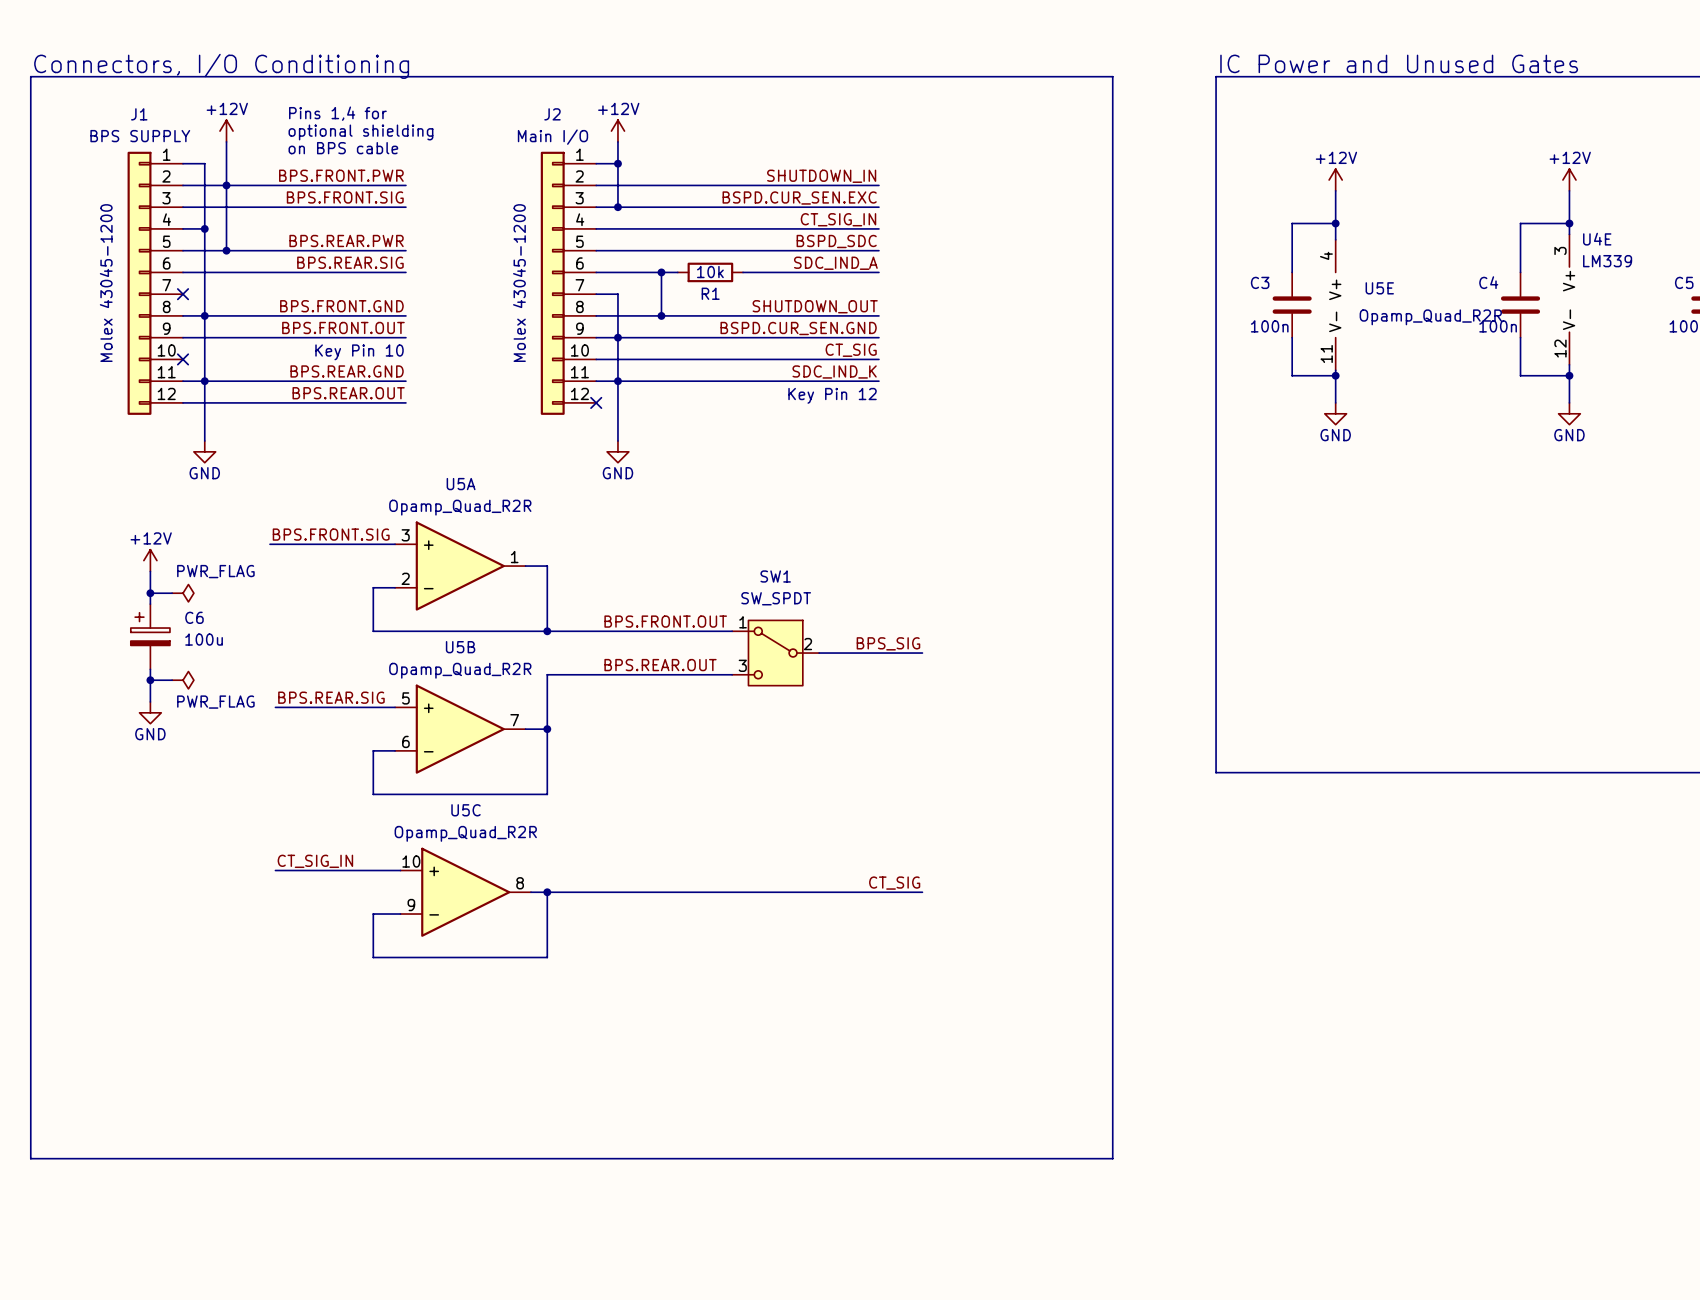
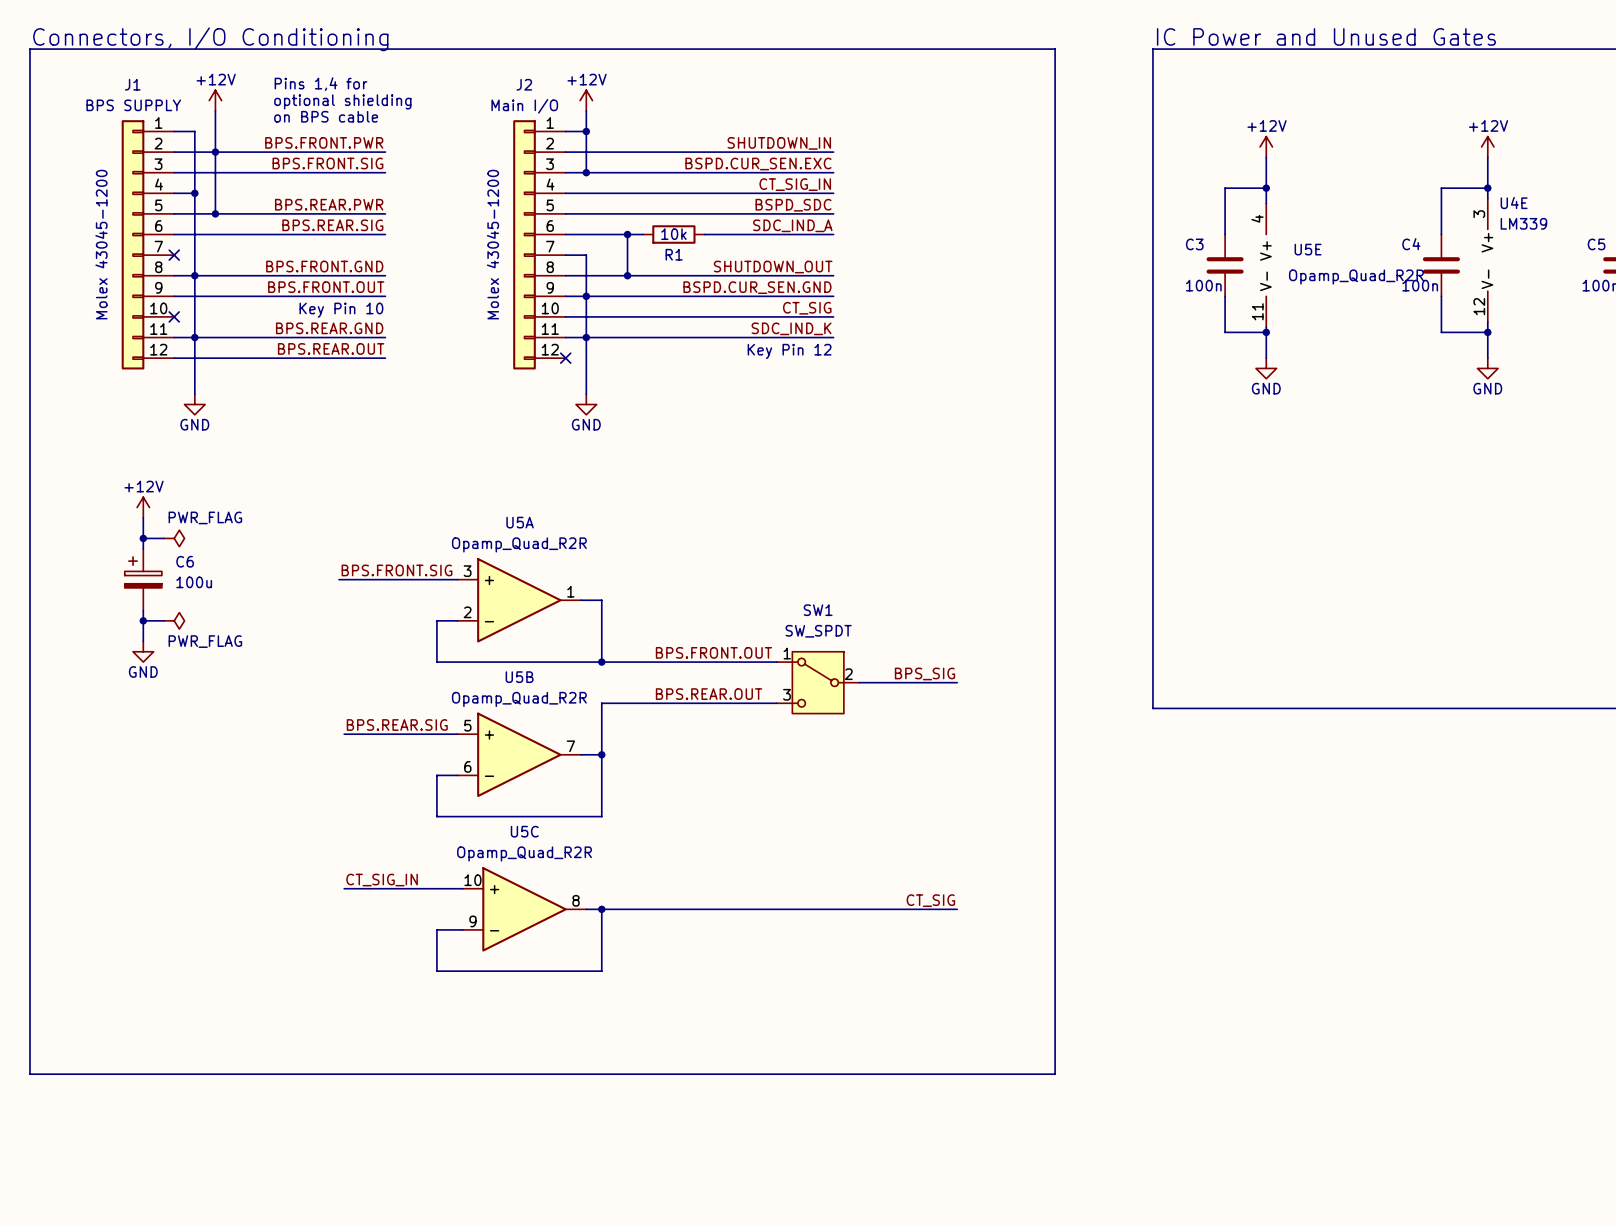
label position: BPS.FRONT.SIG (331, 534) -> BPS.FRONT.SIG (397, 570)
wire: (270, 544) (395, 544) -> (339, 579) (457, 579)
U5A position: (460, 566) -> (519, 600)
wire: (525, 566) (547, 566) (547, 631) -> (581, 600) (601, 600) (601, 662)
wire: (395, 587) (373, 587) (373, 631) (732, 631) -> (457, 620) (436, 620) (436, 662) (776, 662)
label position: BPS.FRONT.OUT (665, 621) -> BPS.FRONT.OUT (713, 652)
junction: (547, 631) -> none
label position: BPS_SIG (888, 643) -> BPS_SIG (925, 673)
SW1 position: (775, 653) -> (818, 682)
wire: (819, 653) (922, 653) -> (859, 682) (957, 682)
label position: BPS.REAR.OUT (660, 665) -> BPS.REAR.OUT (709, 694)
wire: (732, 674) (547, 674) (547, 794) (373, 794) (373, 750) (395, 750) -> (776, 703) (601, 703) (601, 816) (436, 816) (436, 775) (457, 775)
label position: BPS.REAR.SIG (331, 697) -> BPS.REAR.SIG (397, 724)
wire: (275, 707) (395, 707) -> (344, 734) (457, 734)
junction: none -> (601, 662)
U5B position: (460, 729) -> (519, 754)
wire: (525, 729) (547, 729) -> (581, 754) (601, 754)
junction: (547, 729) -> none
junction: none -> (601, 754)
label position: CT_SIG_IN (315, 861) -> CT_SIG_IN (382, 880)
wire: (275, 870) (400, 870) -> (344, 888) (462, 888)
label position: CT_SIG (894, 883) -> CT_SIG (930, 900)
U5C position: (465, 892) -> (524, 909)
wire: (530, 892) (922, 892) -> (586, 909) (957, 909)
wire: (547, 892) (547, 957) (373, 957) (373, 914) (400, 914) -> (601, 909) (601, 971) (436, 971) (436, 929) (462, 929)
junction: (547, 892) -> none
junction: none -> (601, 909)

